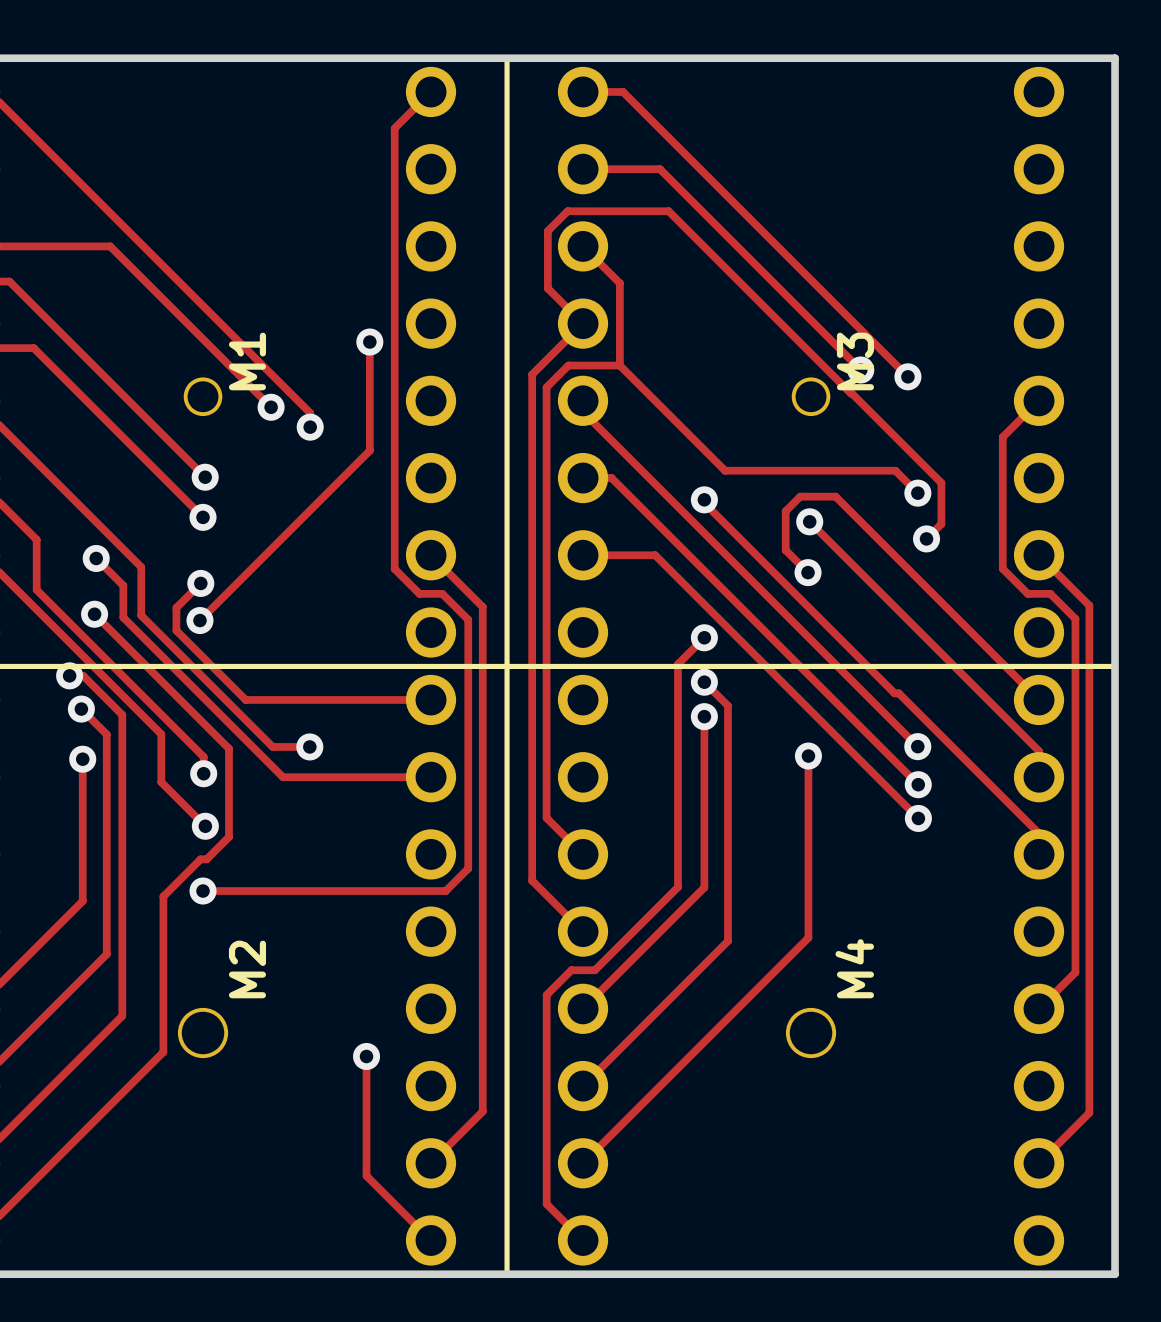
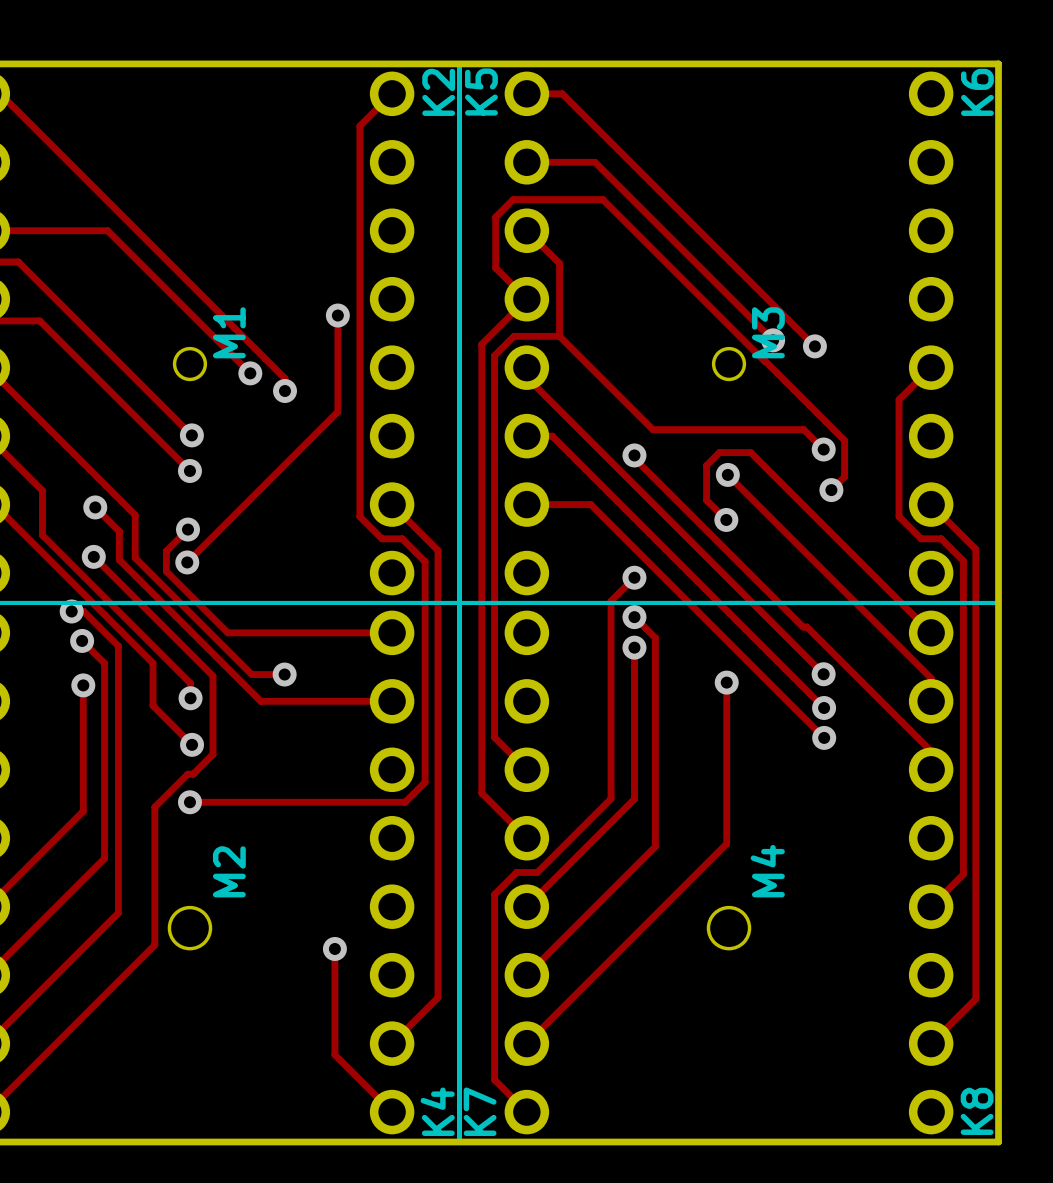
text: none -> K5 (481, 92)
text: none -> K2 (438, 92)
text: none -> K6 (977, 92)
text: none -> K8 (977, 1111)
text: none -> K4 (437, 1111)
text: none -> K7 (480, 1111)

